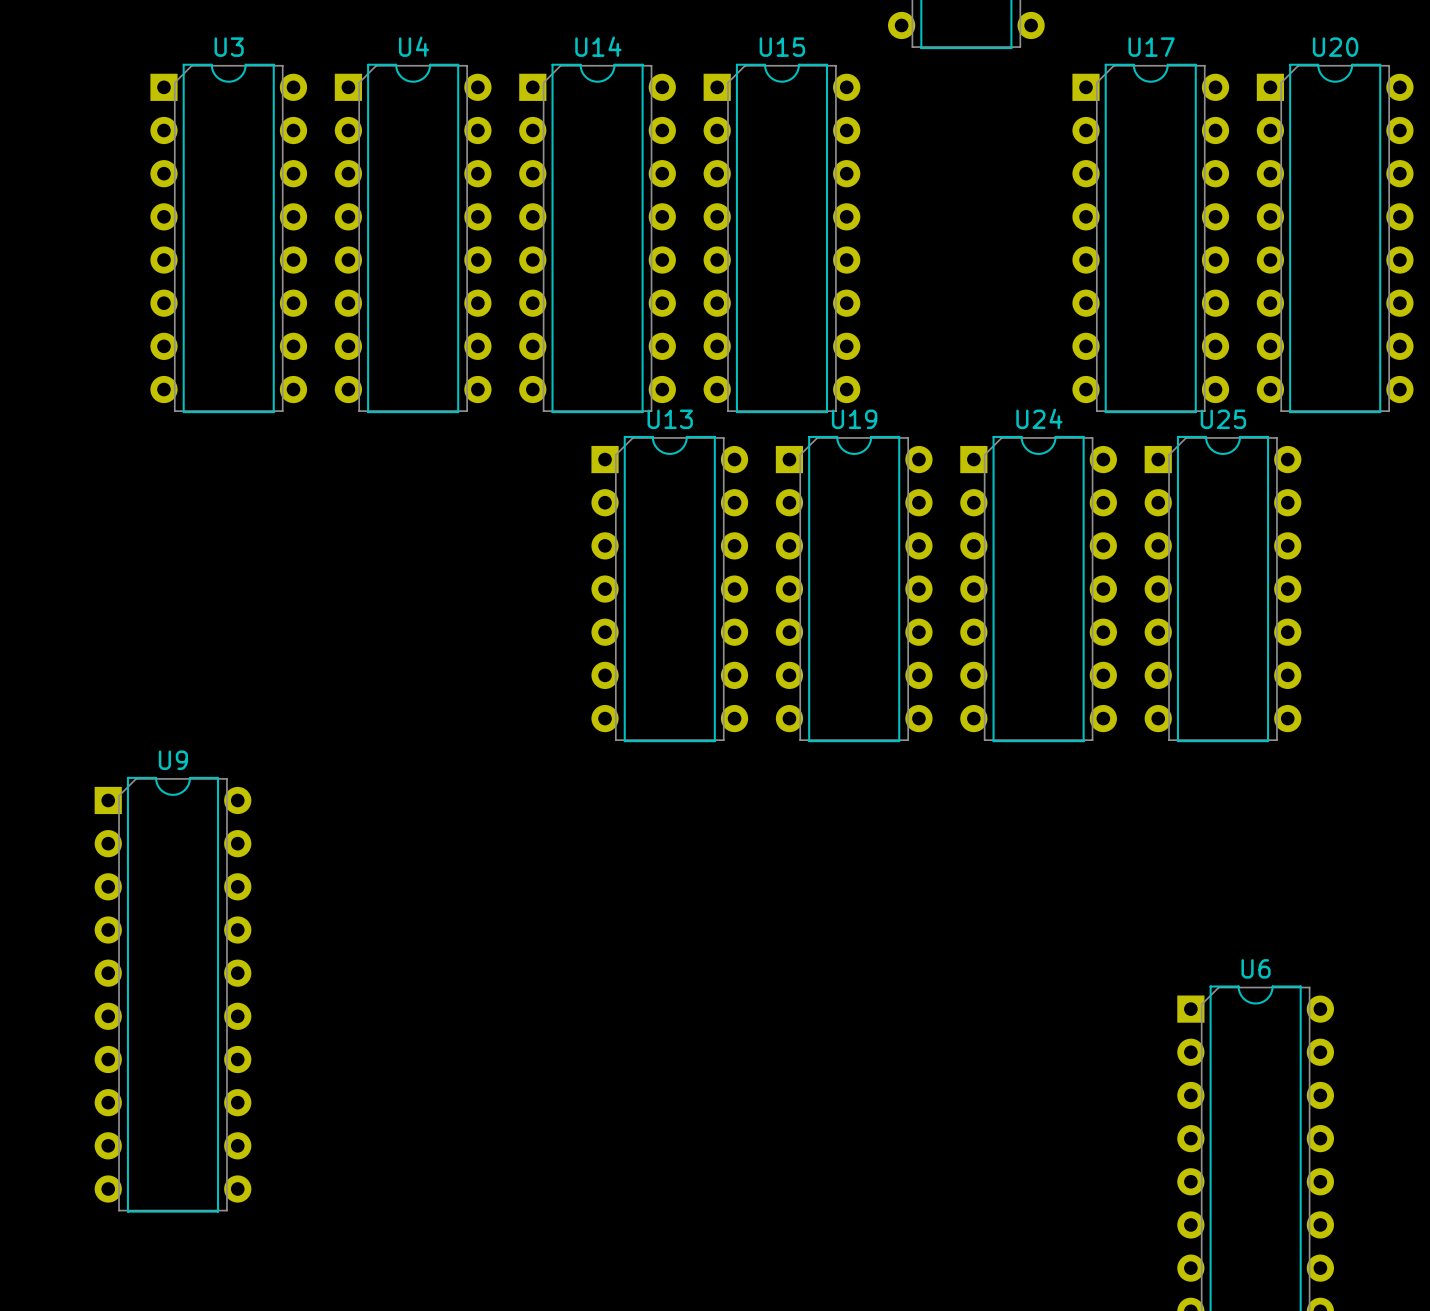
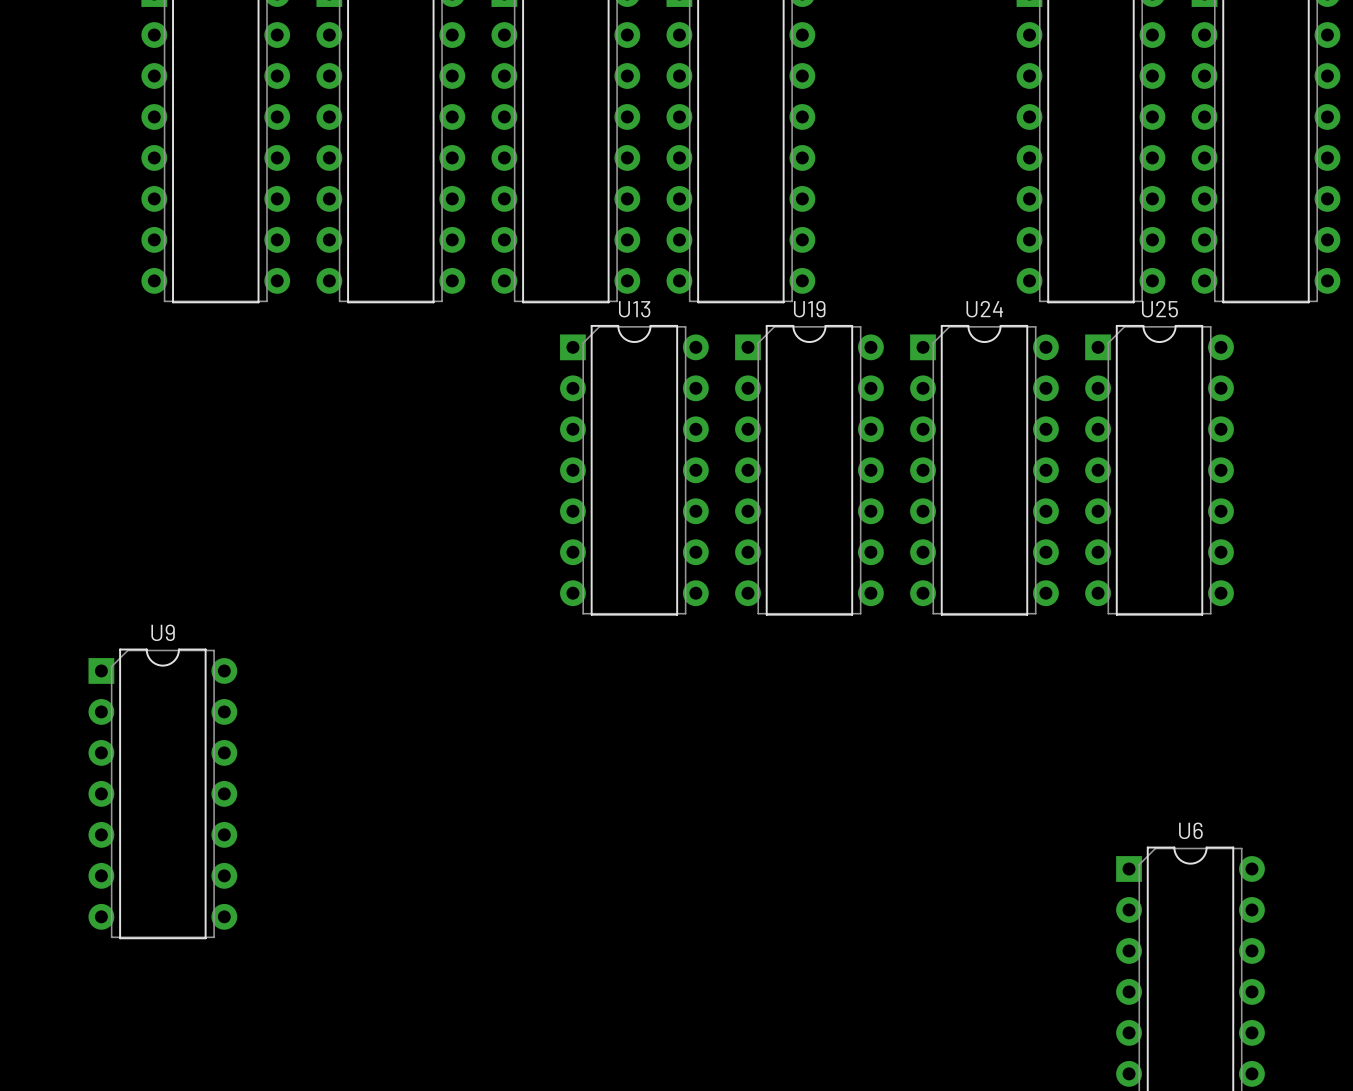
U9 footprint: [94, 776, 252, 1213] -> [88, 648, 238, 940]

